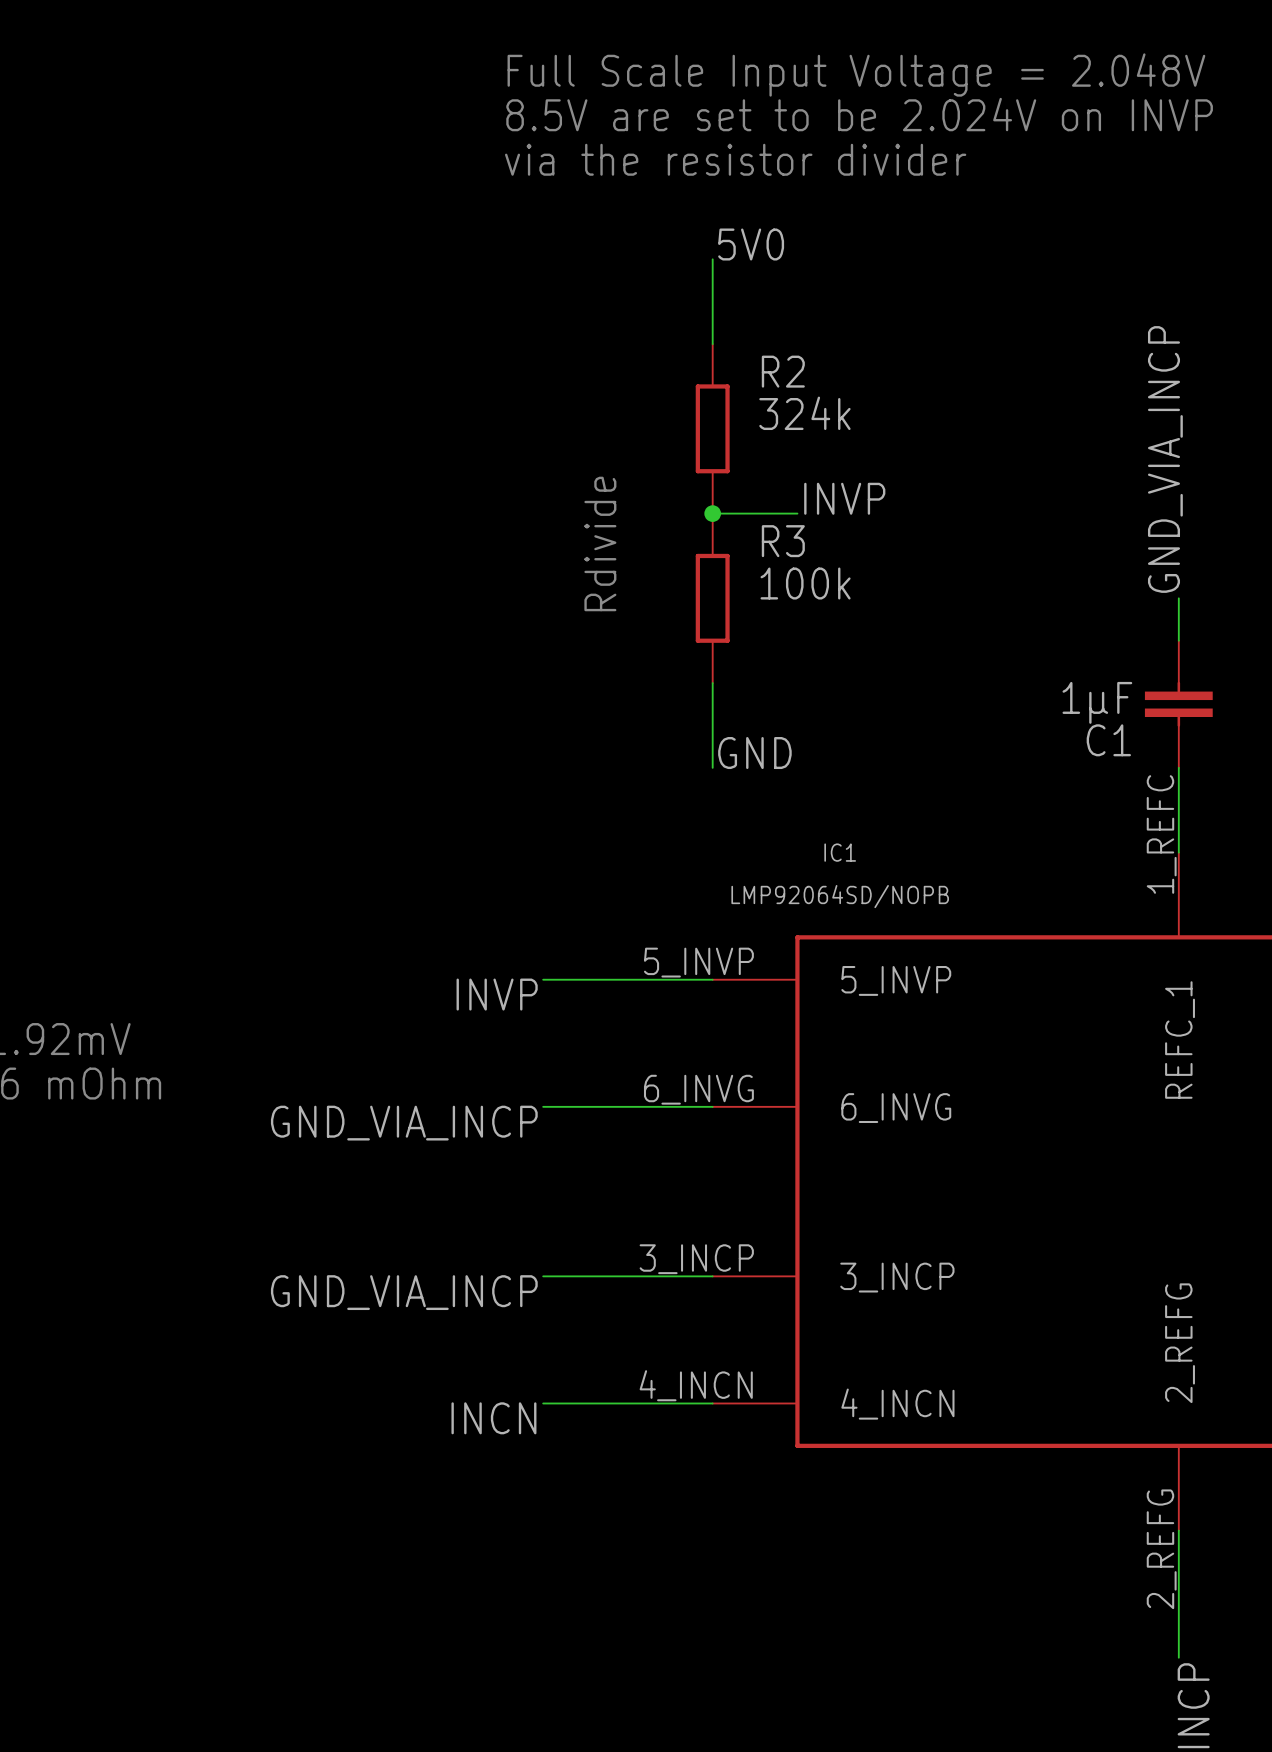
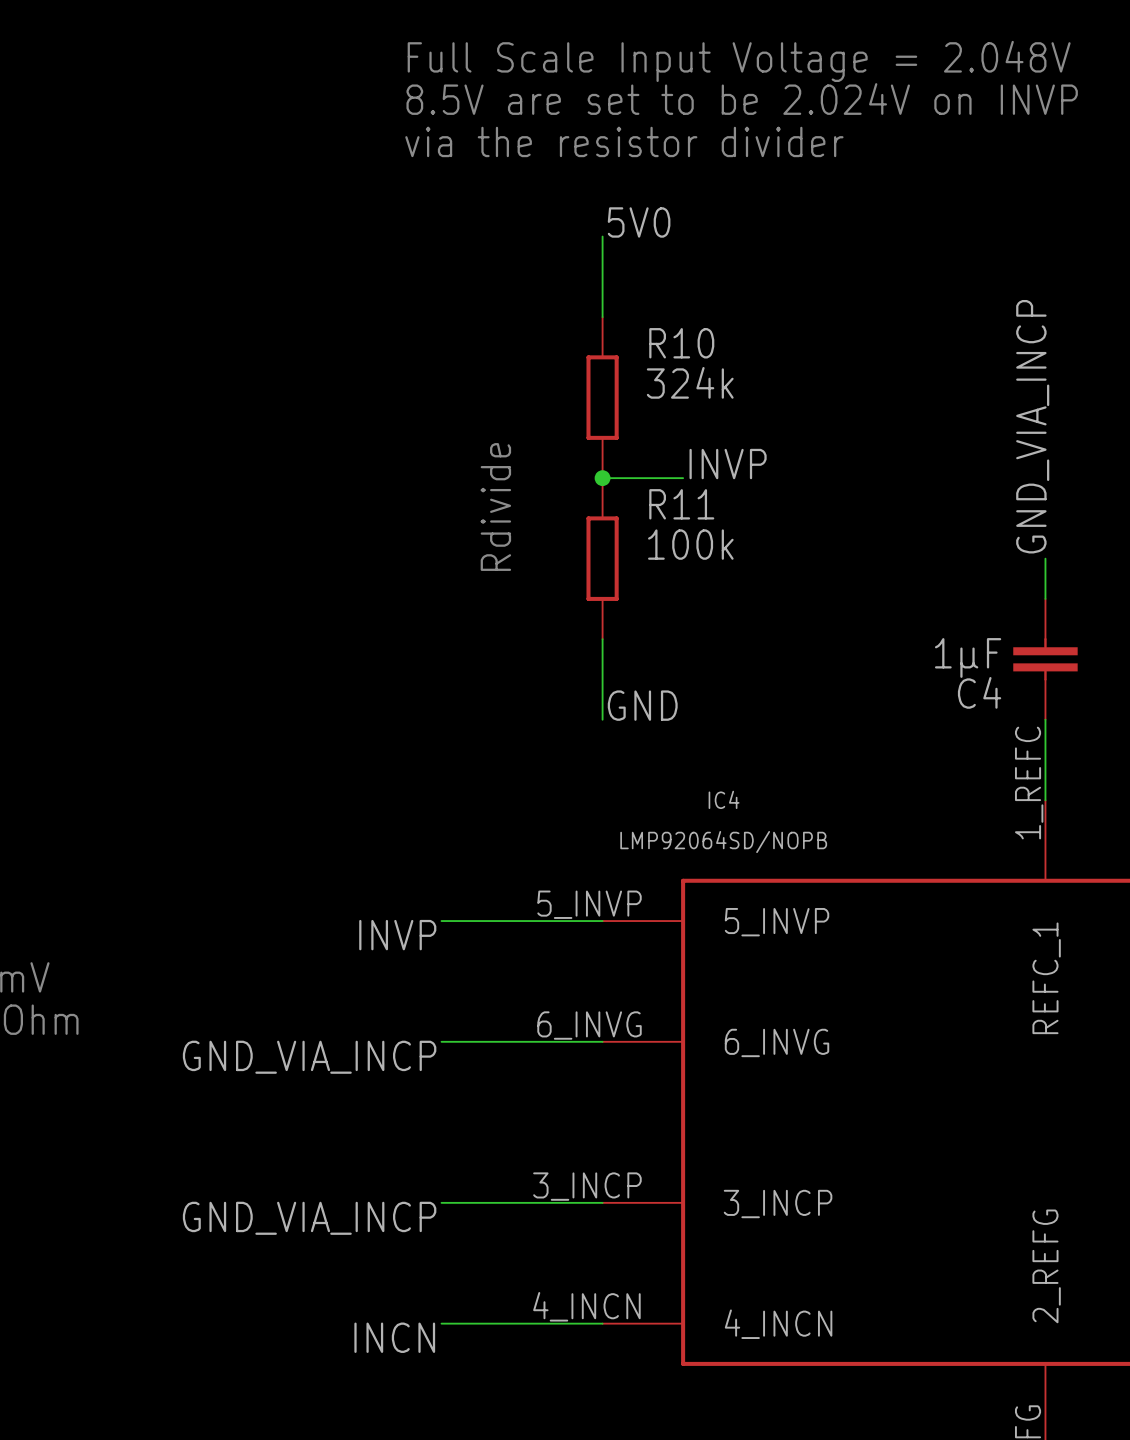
R2 name: R2 (783, 371) -> R10 (681, 343)
R3 name: R3 (783, 541) -> R11 (681, 504)
C1 name: C1 (1108, 740) -> C4 (979, 692)
IC1 name: IC1 (840, 852) -> IC4 (724, 799)

